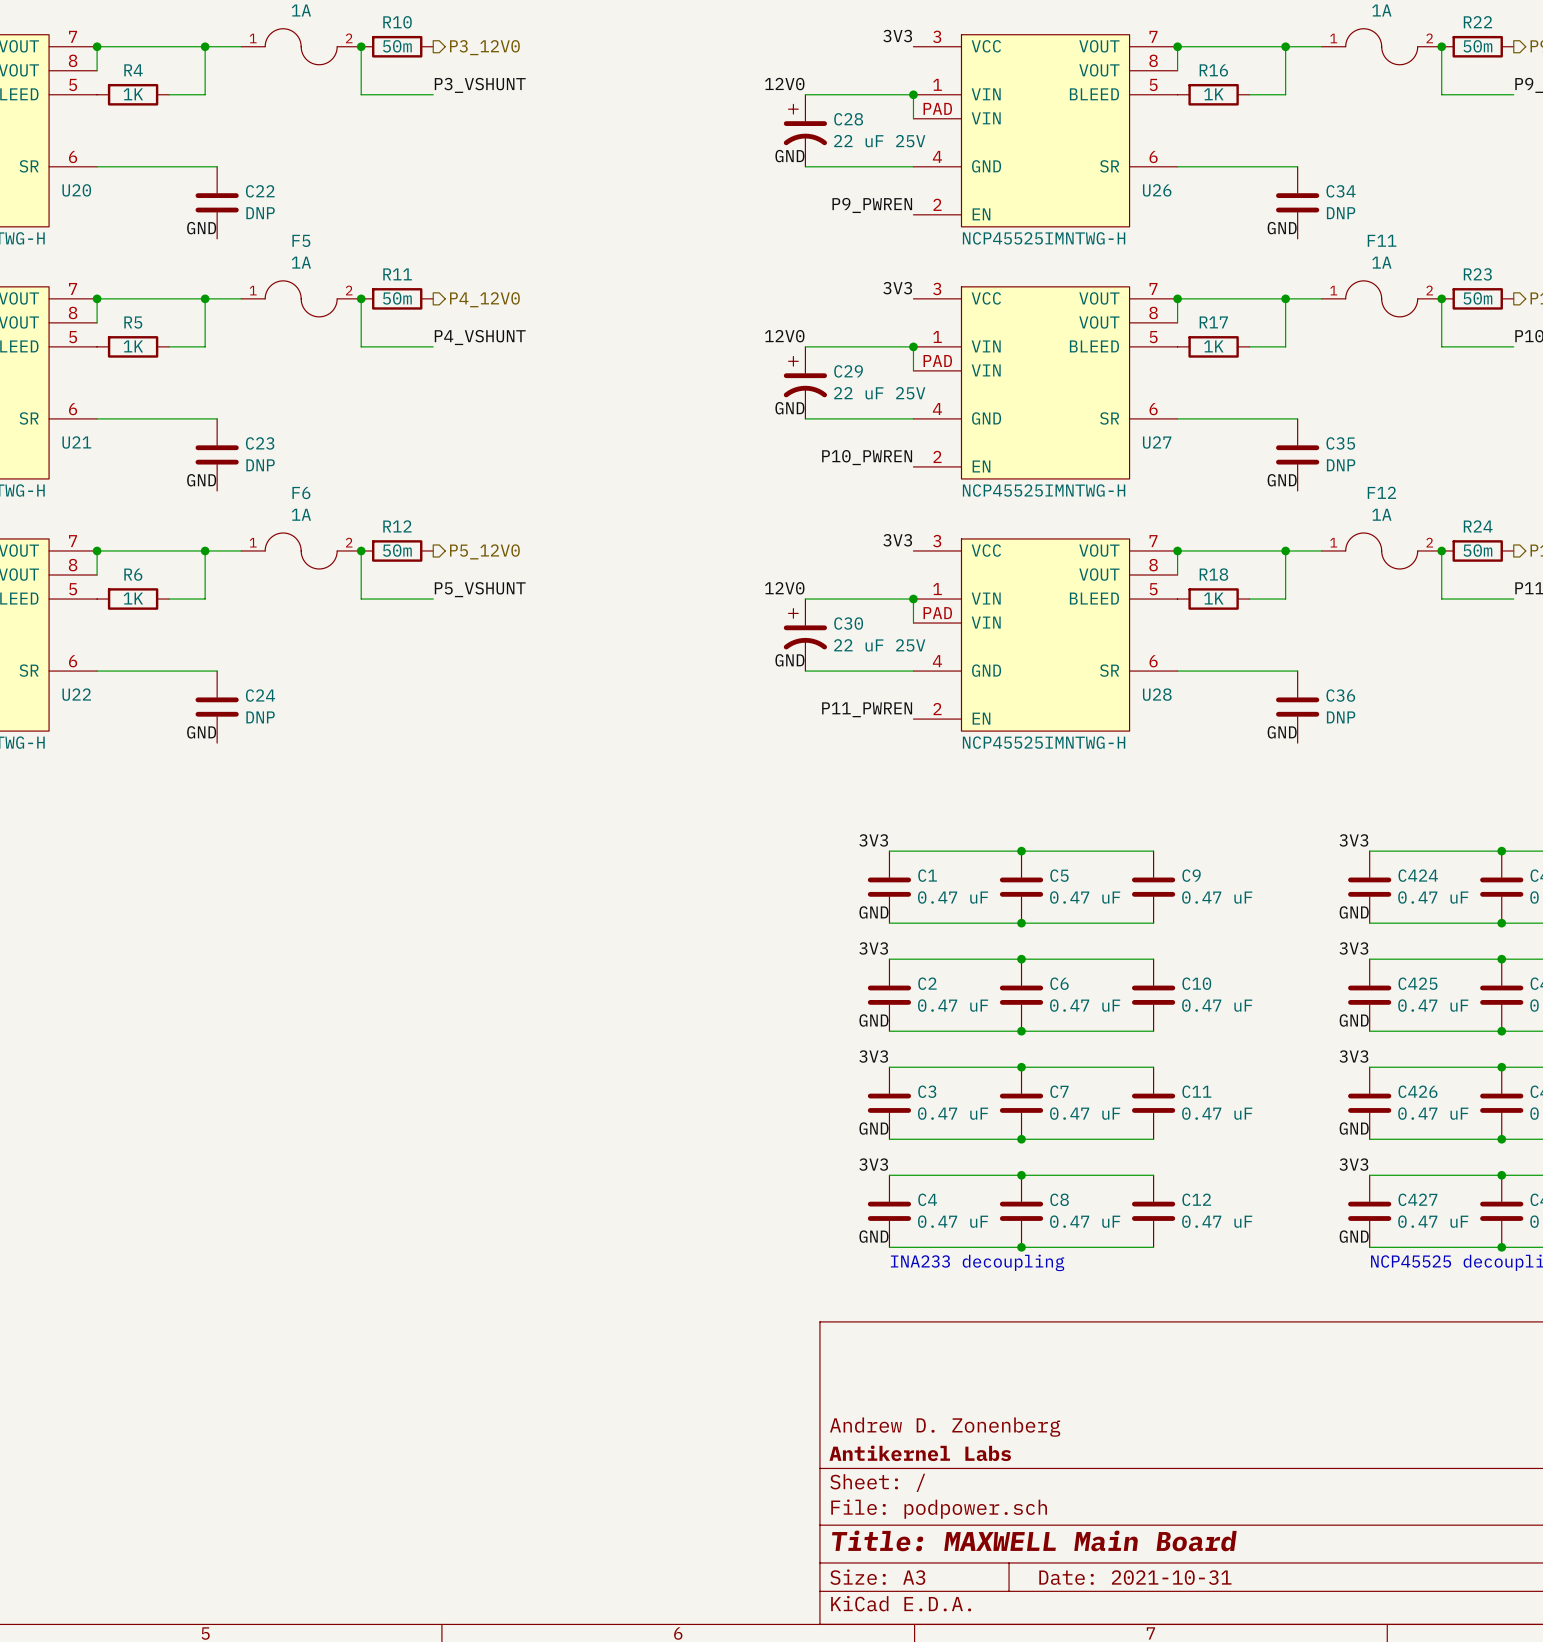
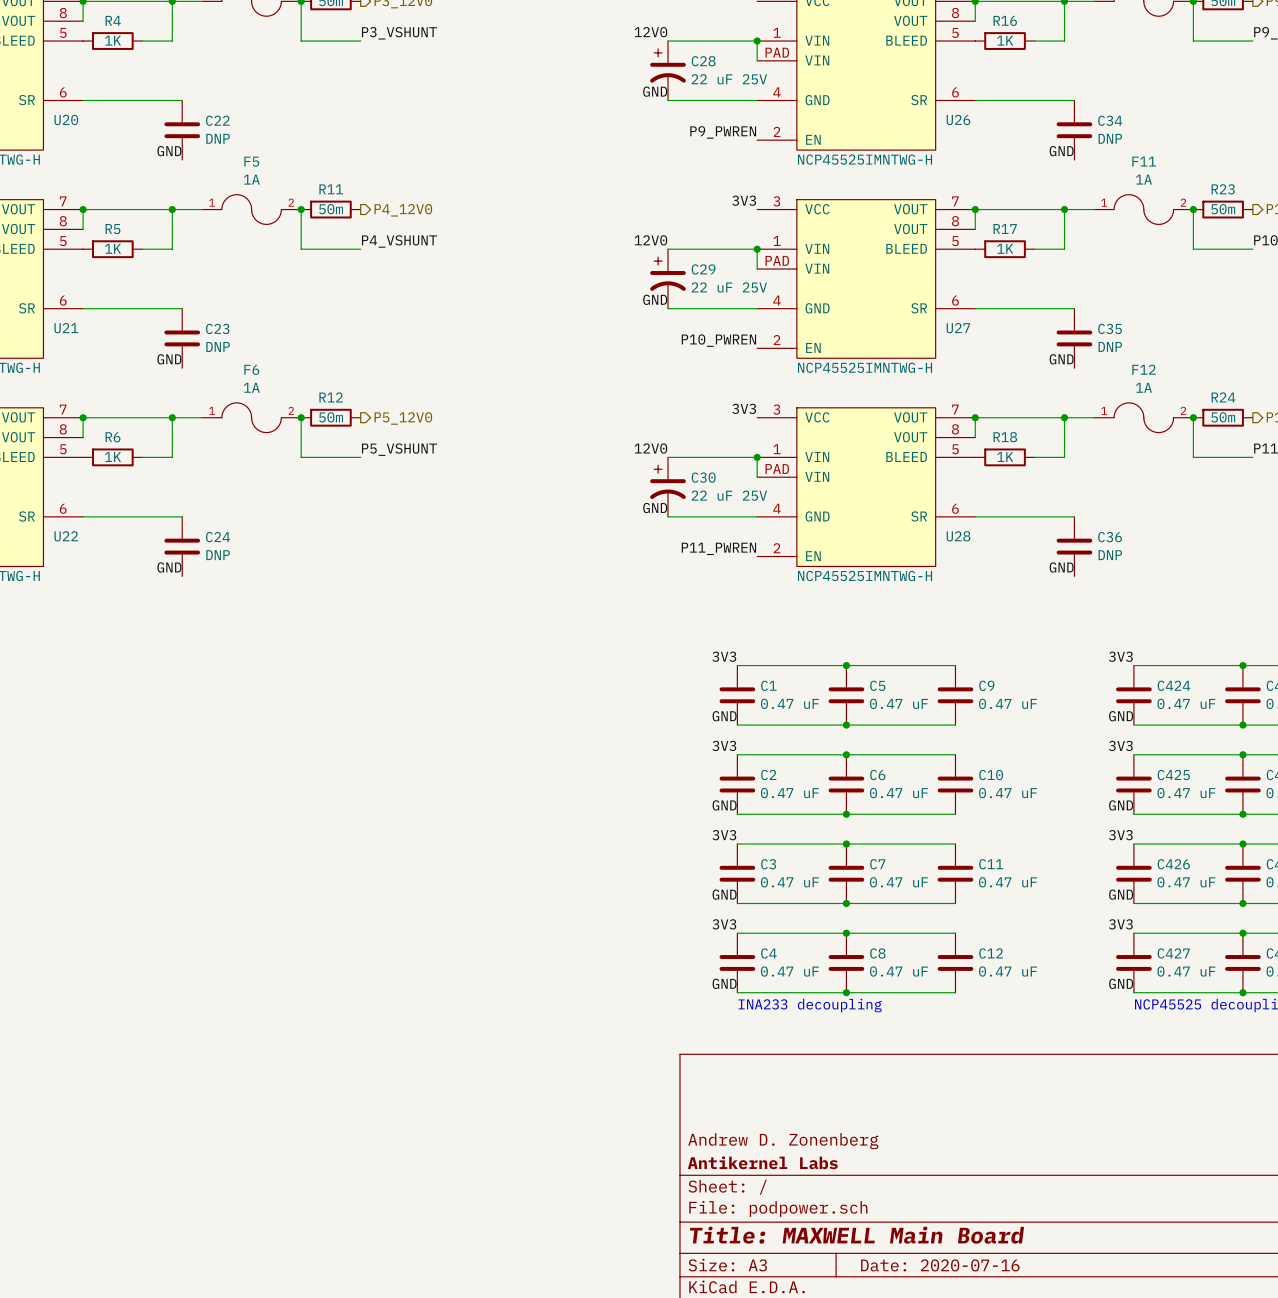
title block: Date: 2021-10-31 (1135, 1577) -> Date: 2020-07-16 (940, 1265)

